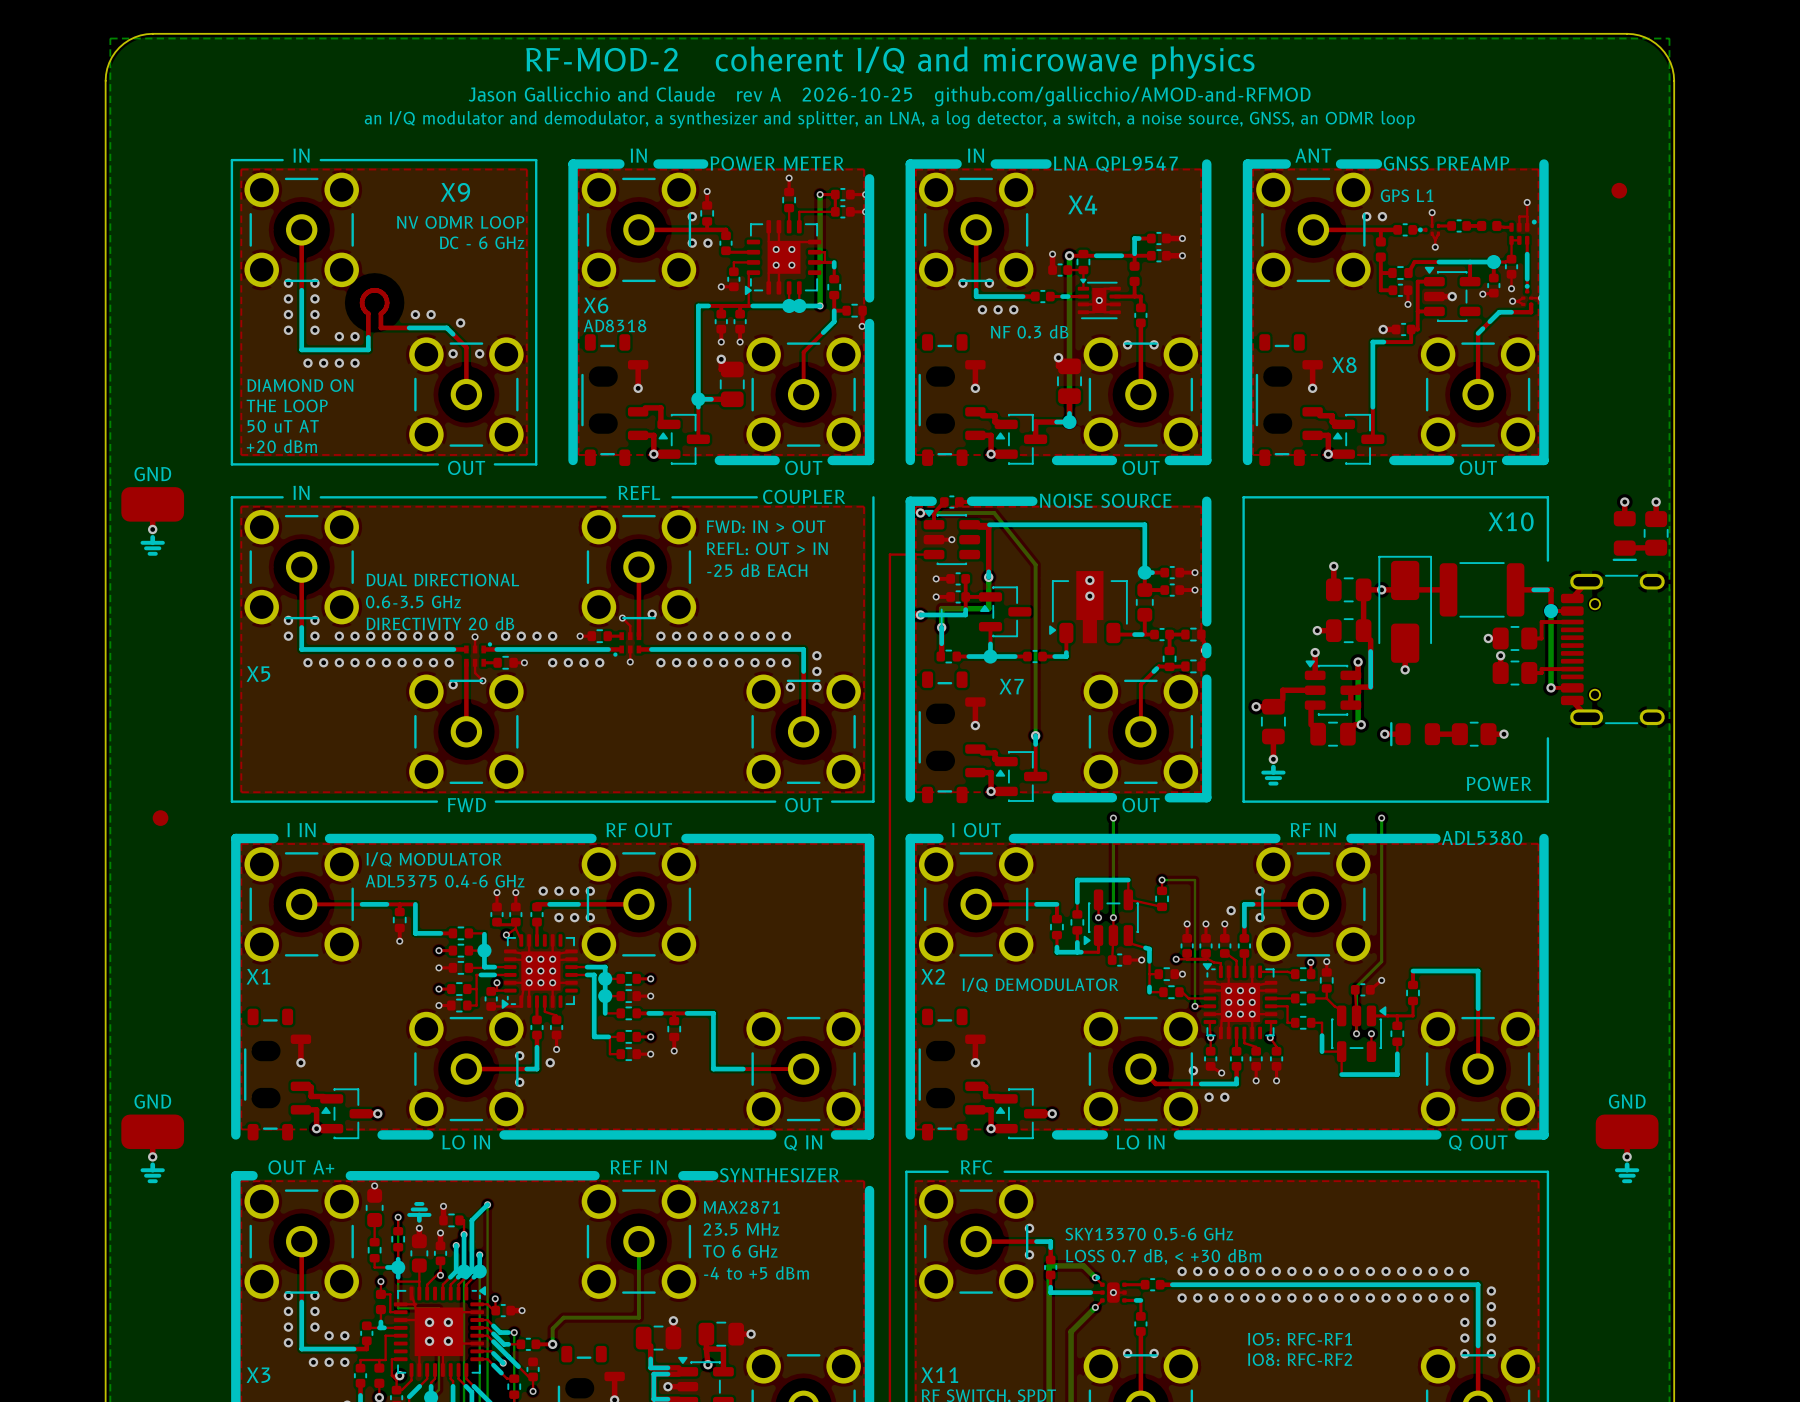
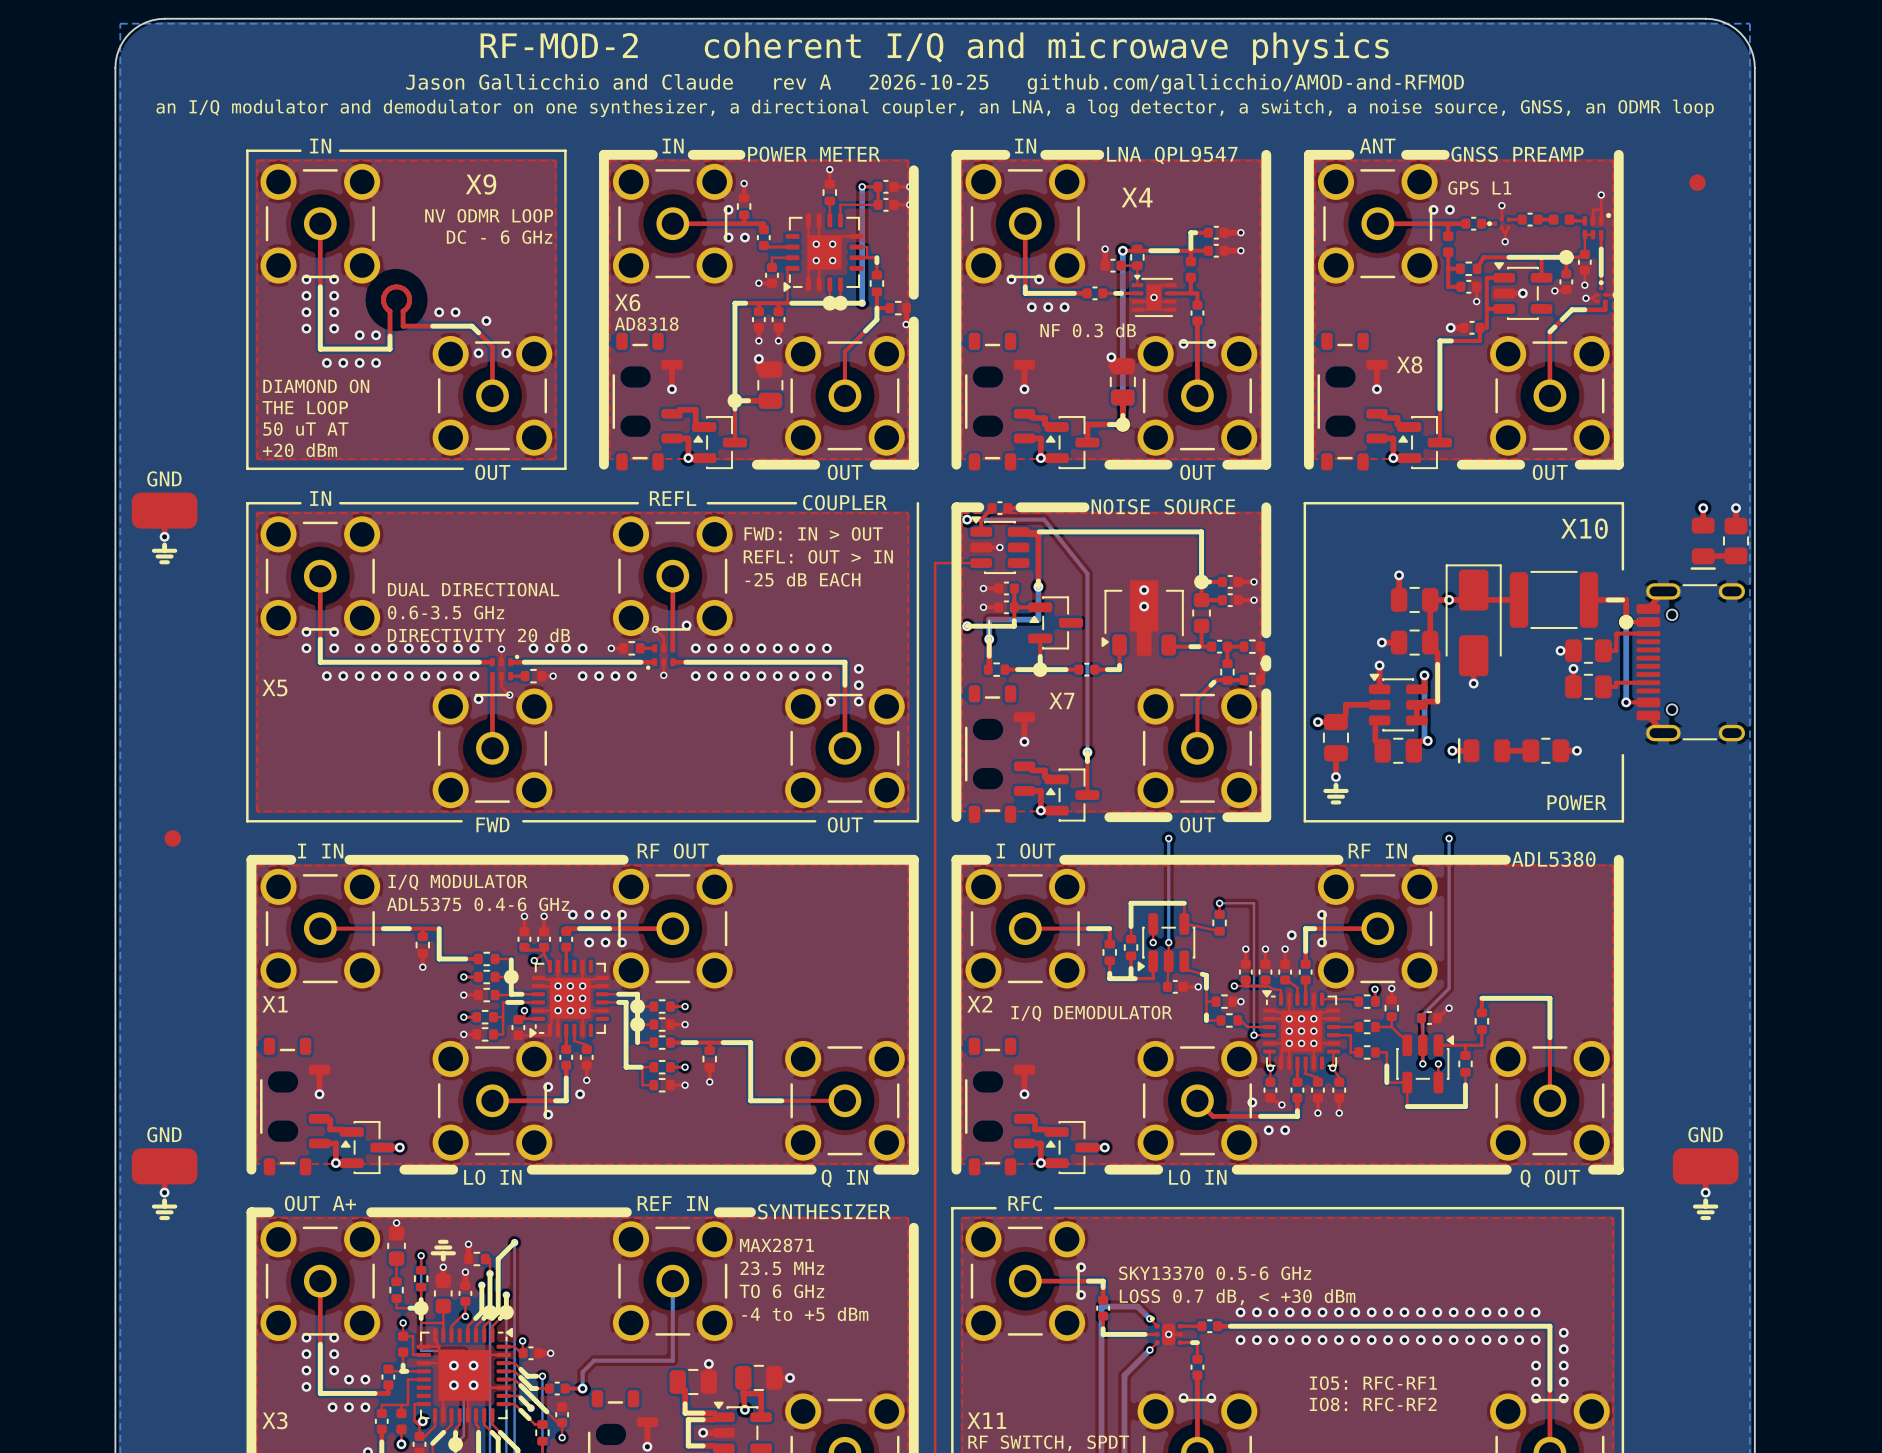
text: an I/Q modulator and demodulator, a synthesizer and splitter, an LNA, a log detector, a switch, a noise source, GNSS, an ODMR loop (889, 119) -> an I/Q modulator and demodulator on one synthesizer, a directional coupler, an LNA, a log detector, a switch, a noise source, GNSS, an ODMR loop (935, 108)

